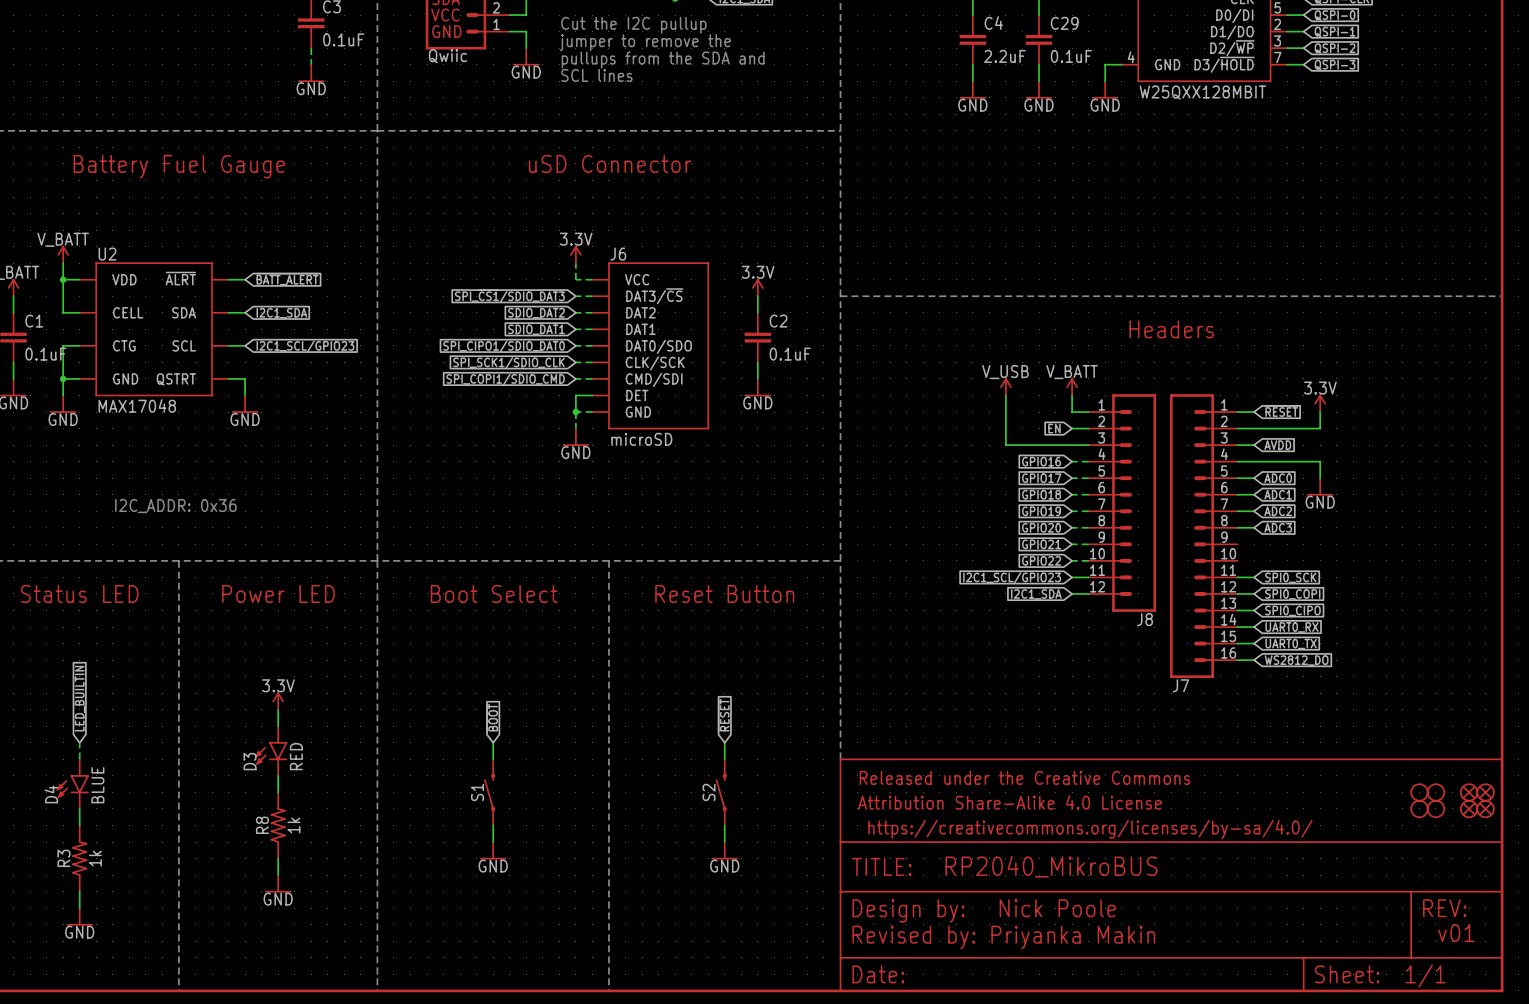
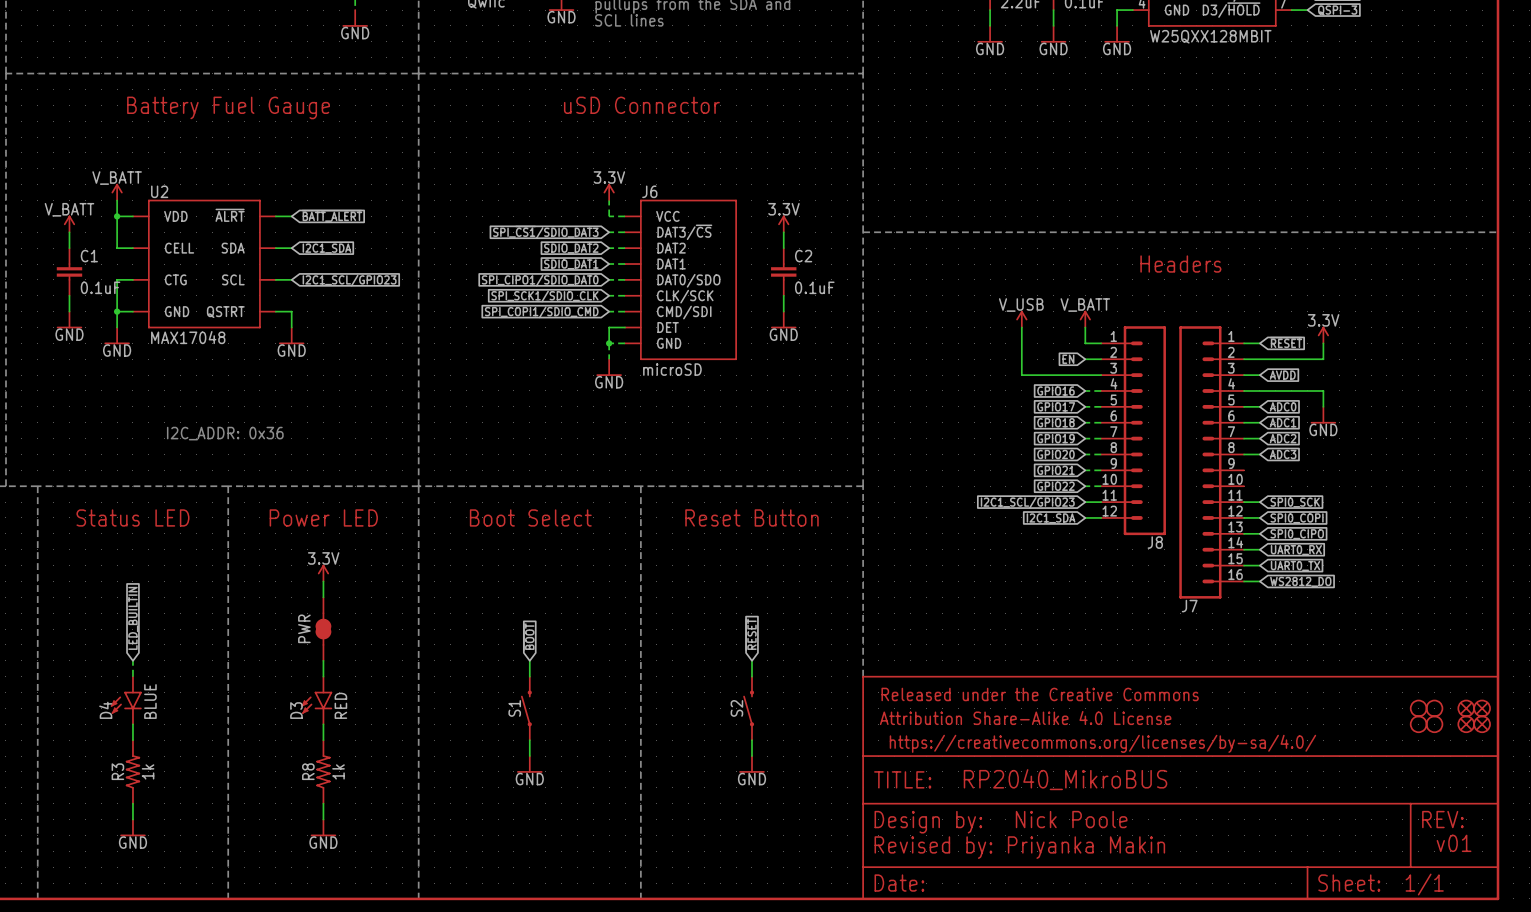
wire: none -> (323, 581) (323, 597)
power symbol position: 3.3V (278, 701) -> 3.3V (323, 573)
PWR: none -> (323, 629)
D3 position: (271, 751) -> (316, 700)
wire: (278, 775) (278, 792) -> (323, 724) (323, 740)
R8 position: (278, 825) -> (323, 771)
wire: (278, 858) (278, 875) -> (323, 803) (323, 819)
power symbol position: GND (278, 883) -> GND (323, 827)

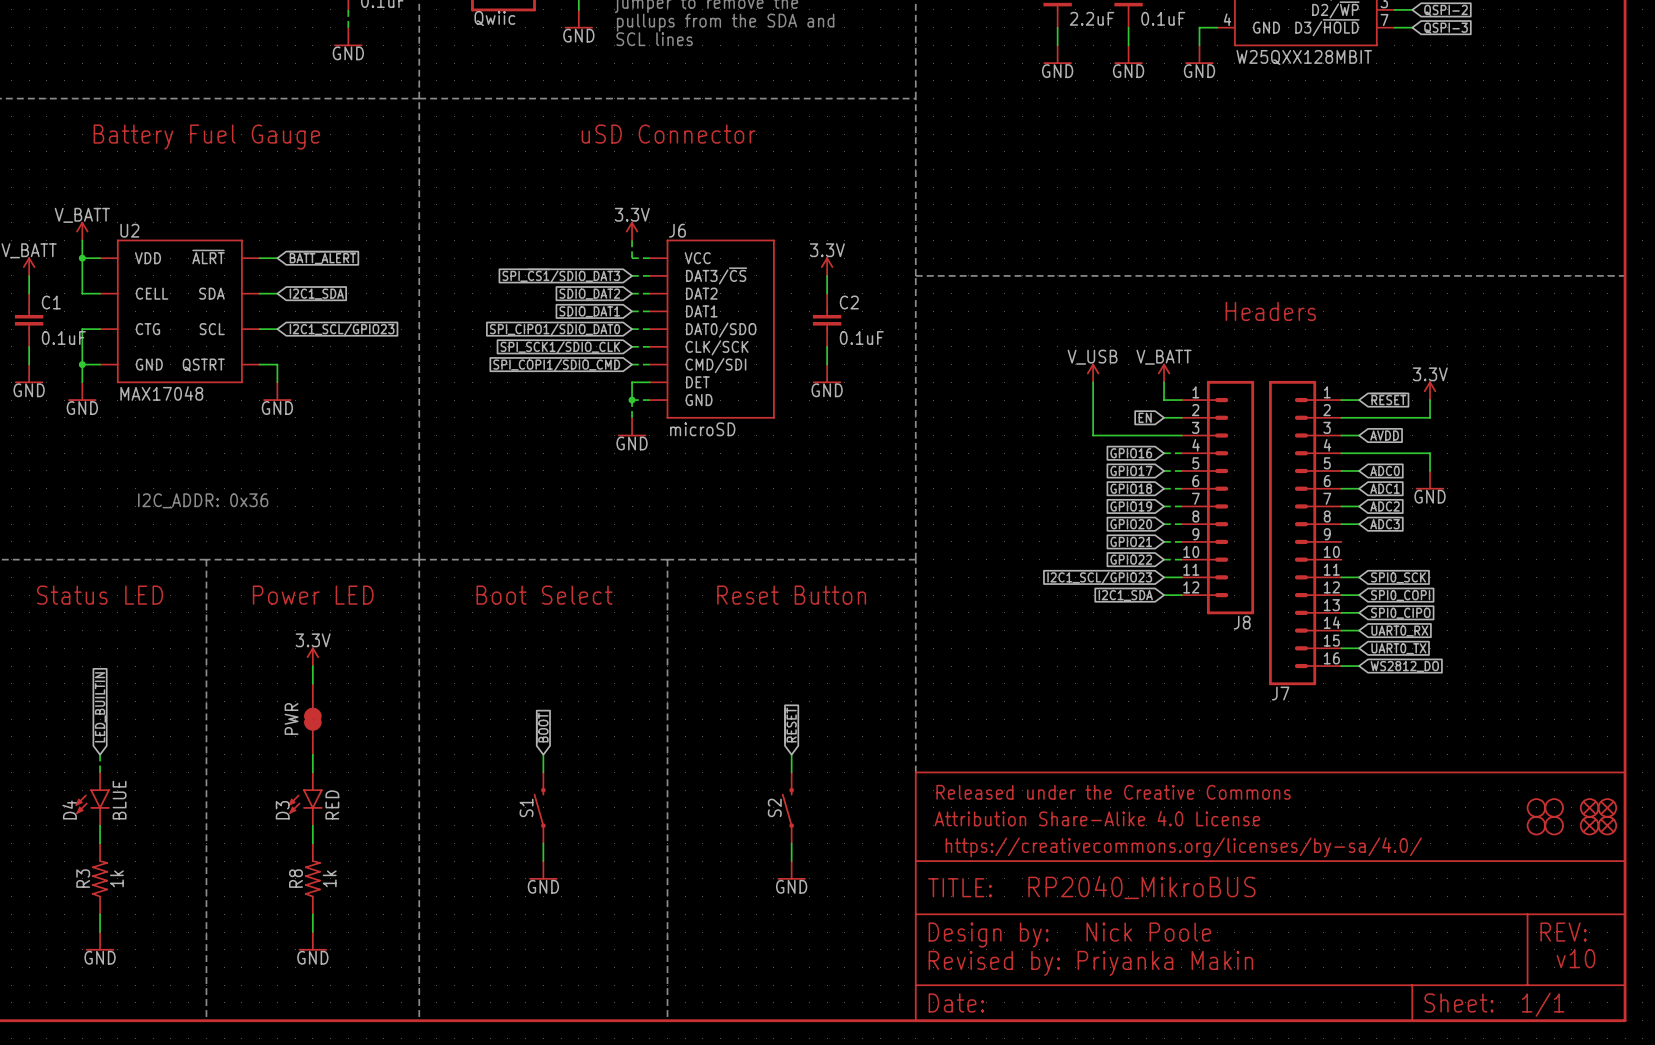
text: v01 (1454, 843) -> v10 (1575, 958)

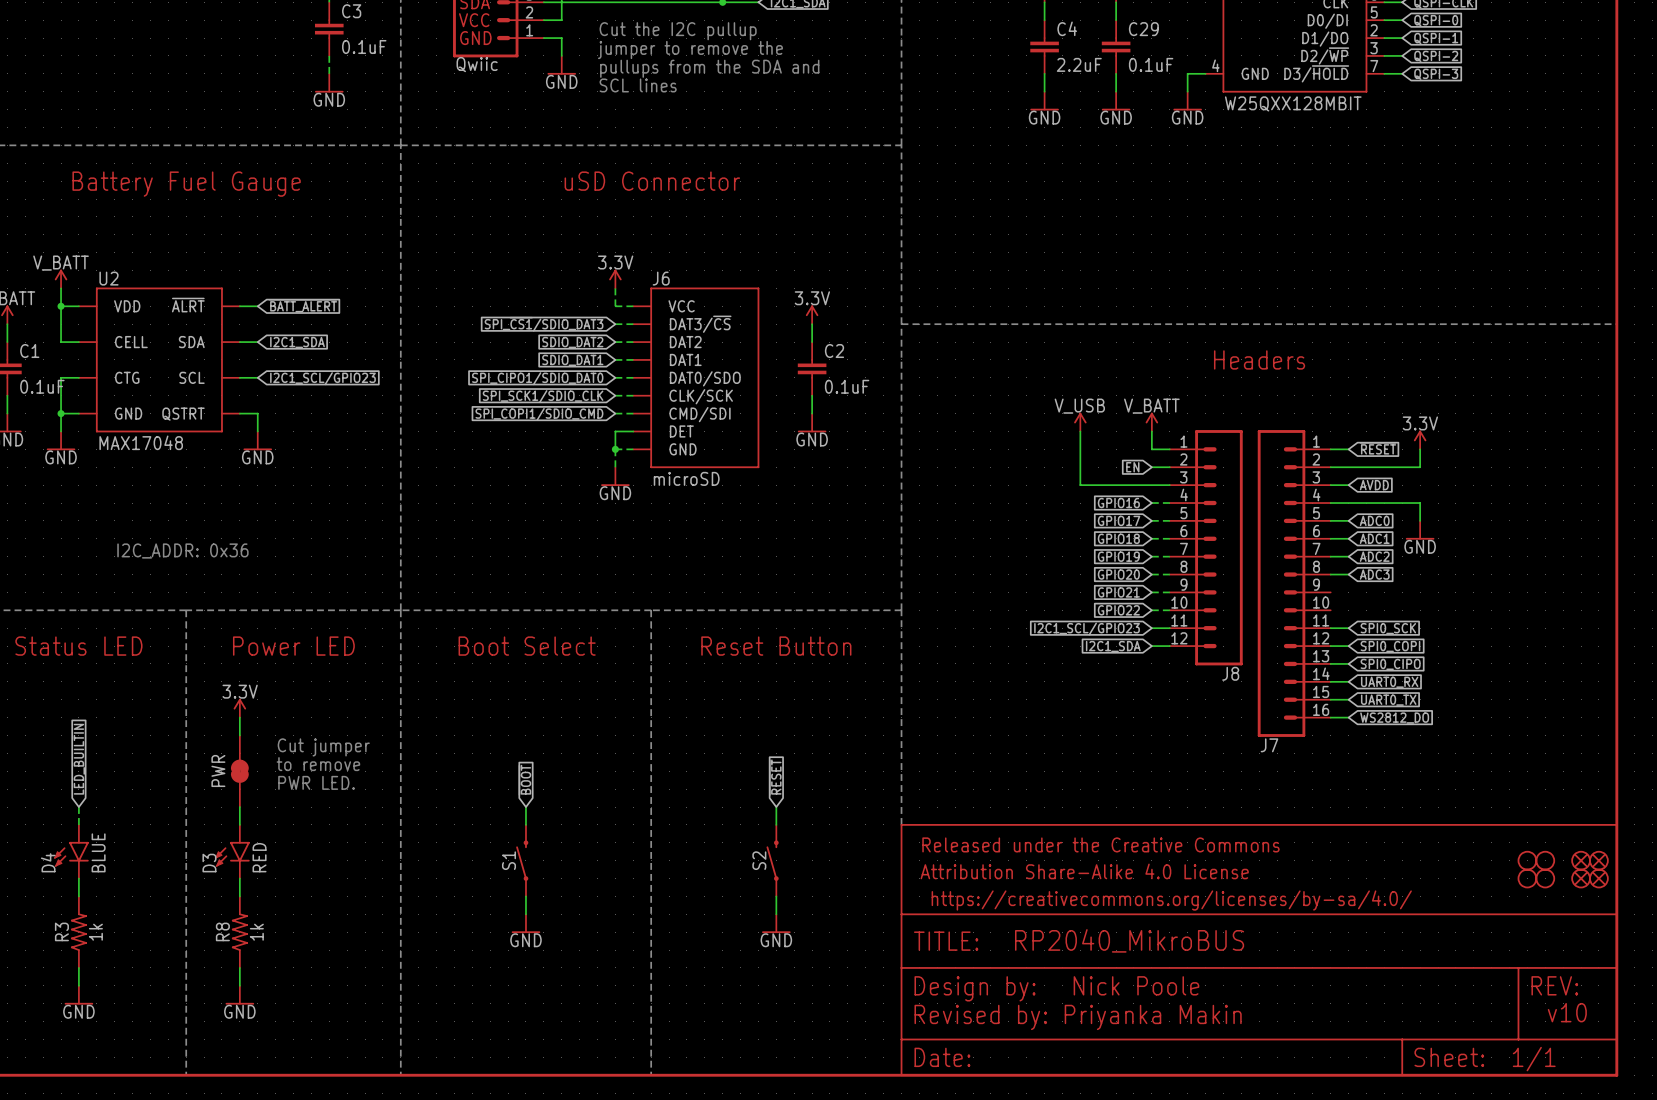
power symbol position: 3.3V (312, 656) -> 3.3V (239, 708)
wire: (312, 666) (312, 683) -> (239, 717) (239, 735)
text: none -> Cut jumper (323, 747)
text: none -> to remove (318, 764)
PWR position: (312, 719) -> (239, 771)
text: none -> PWR LED. (316, 782)
wire: (312, 754) (312, 772) -> (239, 807) (239, 824)
D3 position: (305, 799) -> (232, 851)
wire: (312, 825) (312, 843) -> (239, 878) (239, 896)
R8 position: (312, 878) -> (239, 932)
wire: (312, 914) (312, 932) -> (239, 967) (239, 985)
power symbol position: GND (312, 941) -> GND (239, 995)

